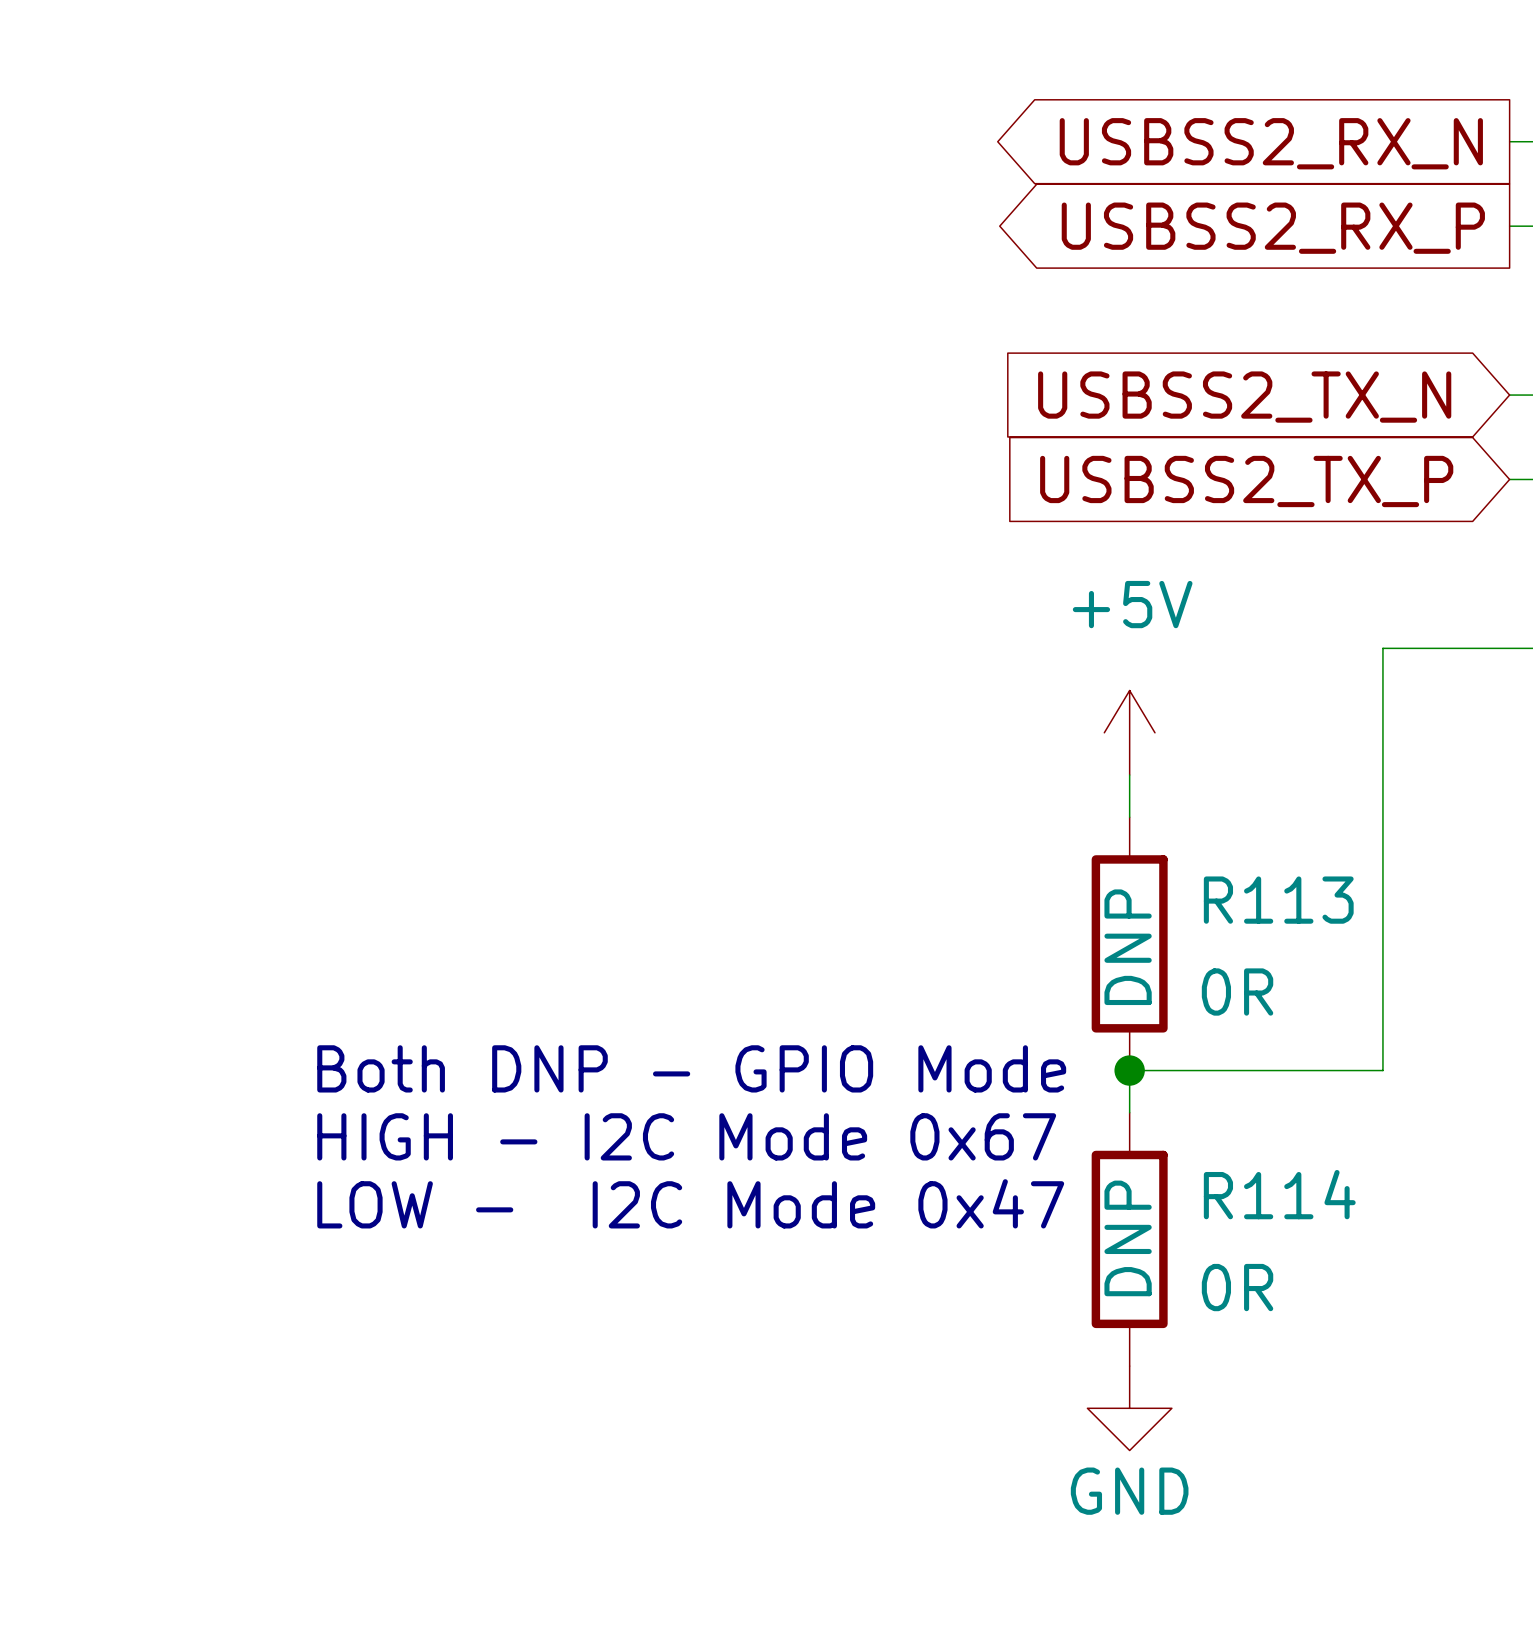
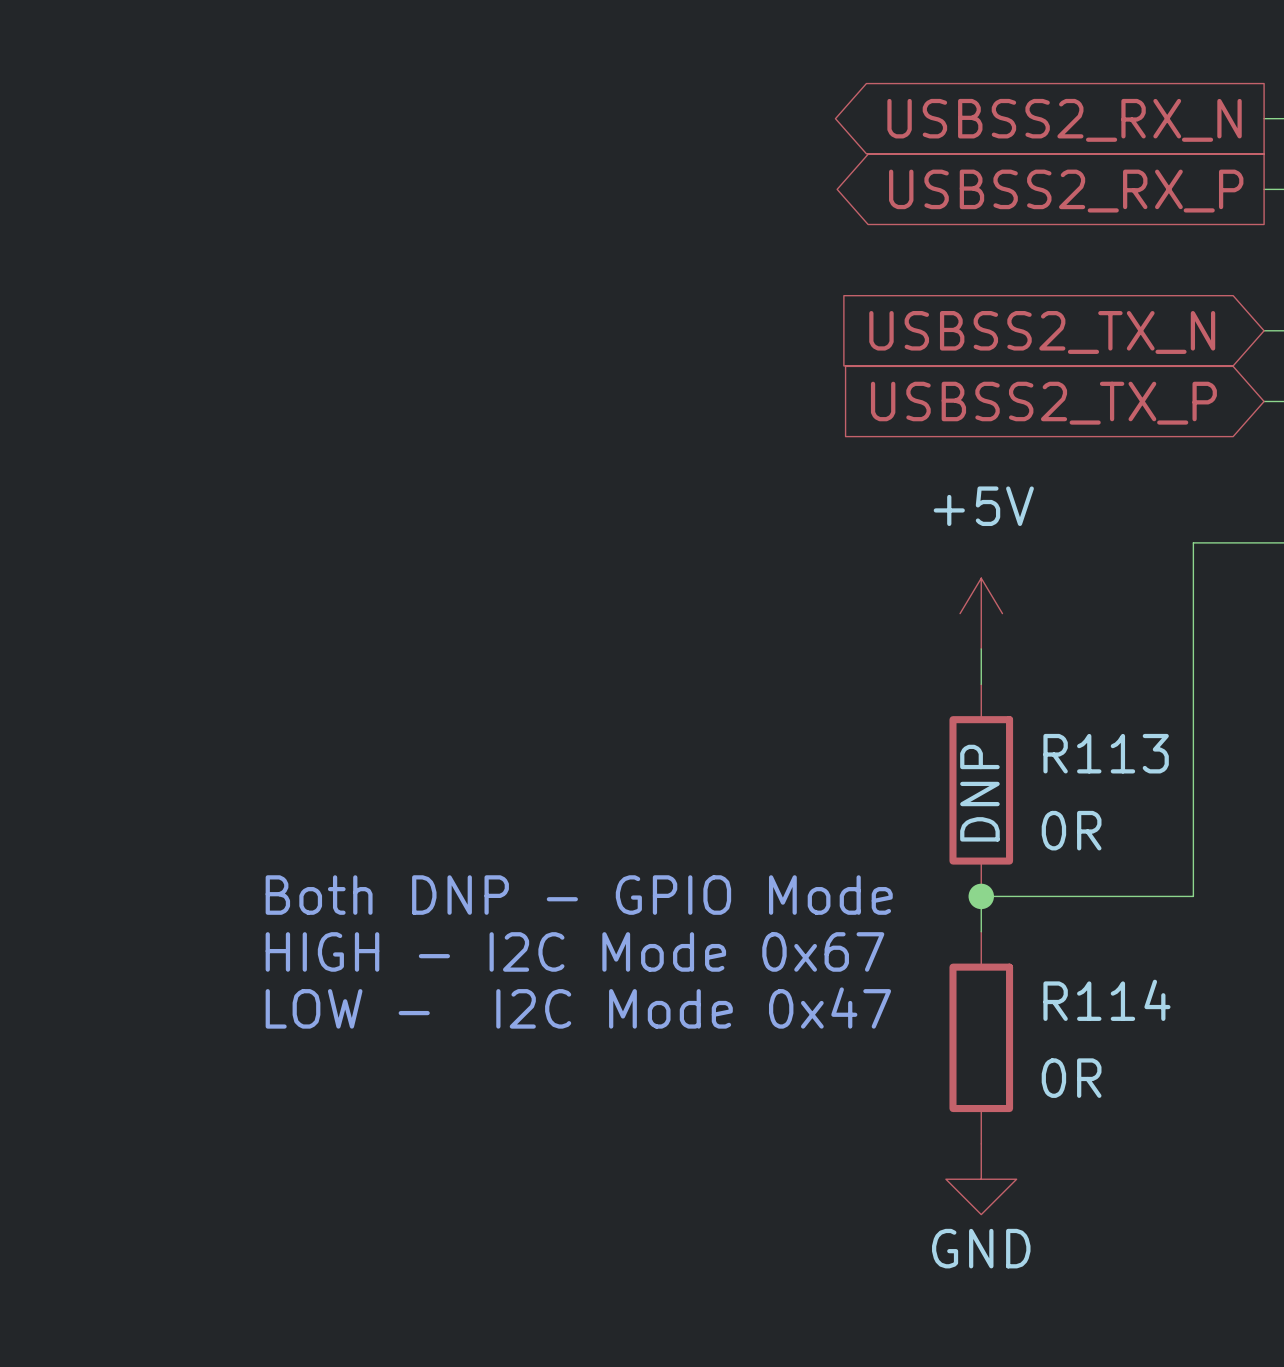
wire: (1425, 648) (1382, 648) (1382, 1070) -> (1193, 542) (1193, 896) (1158, 896)
power symbol position: +5V (1129, 732) -> +5V (981, 613)
wire: (1129, 775) (1129, 817) -> (981, 648) (981, 684)
R113 position: (1129, 943) -> (981, 790)
junction position: (1129, 1070) -> (981, 896)
wire: (1171, 1070) (1129, 1070) (1129, 1112) -> (981, 896) (981, 931)
R114 text: DNP (1128, 1238) -> none
R114 position: (1129, 1239) -> (981, 1037)
power symbol position: GND (1129, 1408) -> GND (981, 1179)

